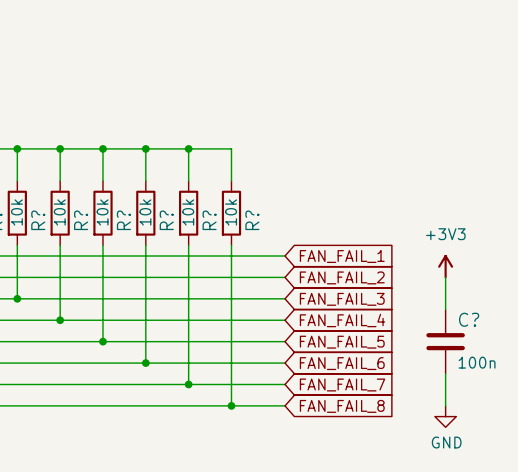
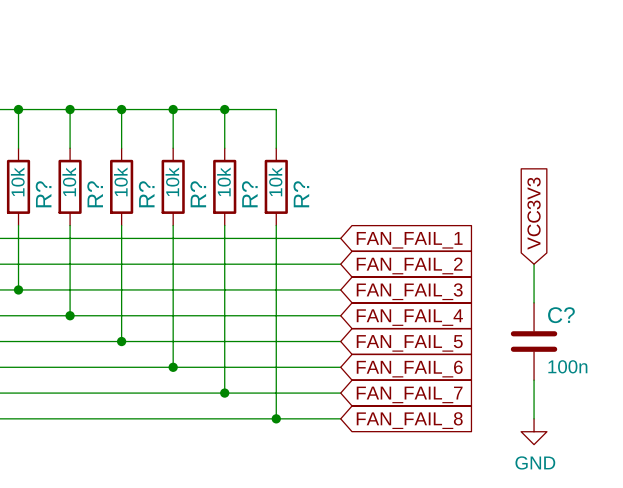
global label: none -> VCC3V3 (534, 213)
power symbol: +3V3 (445, 266) -> none

